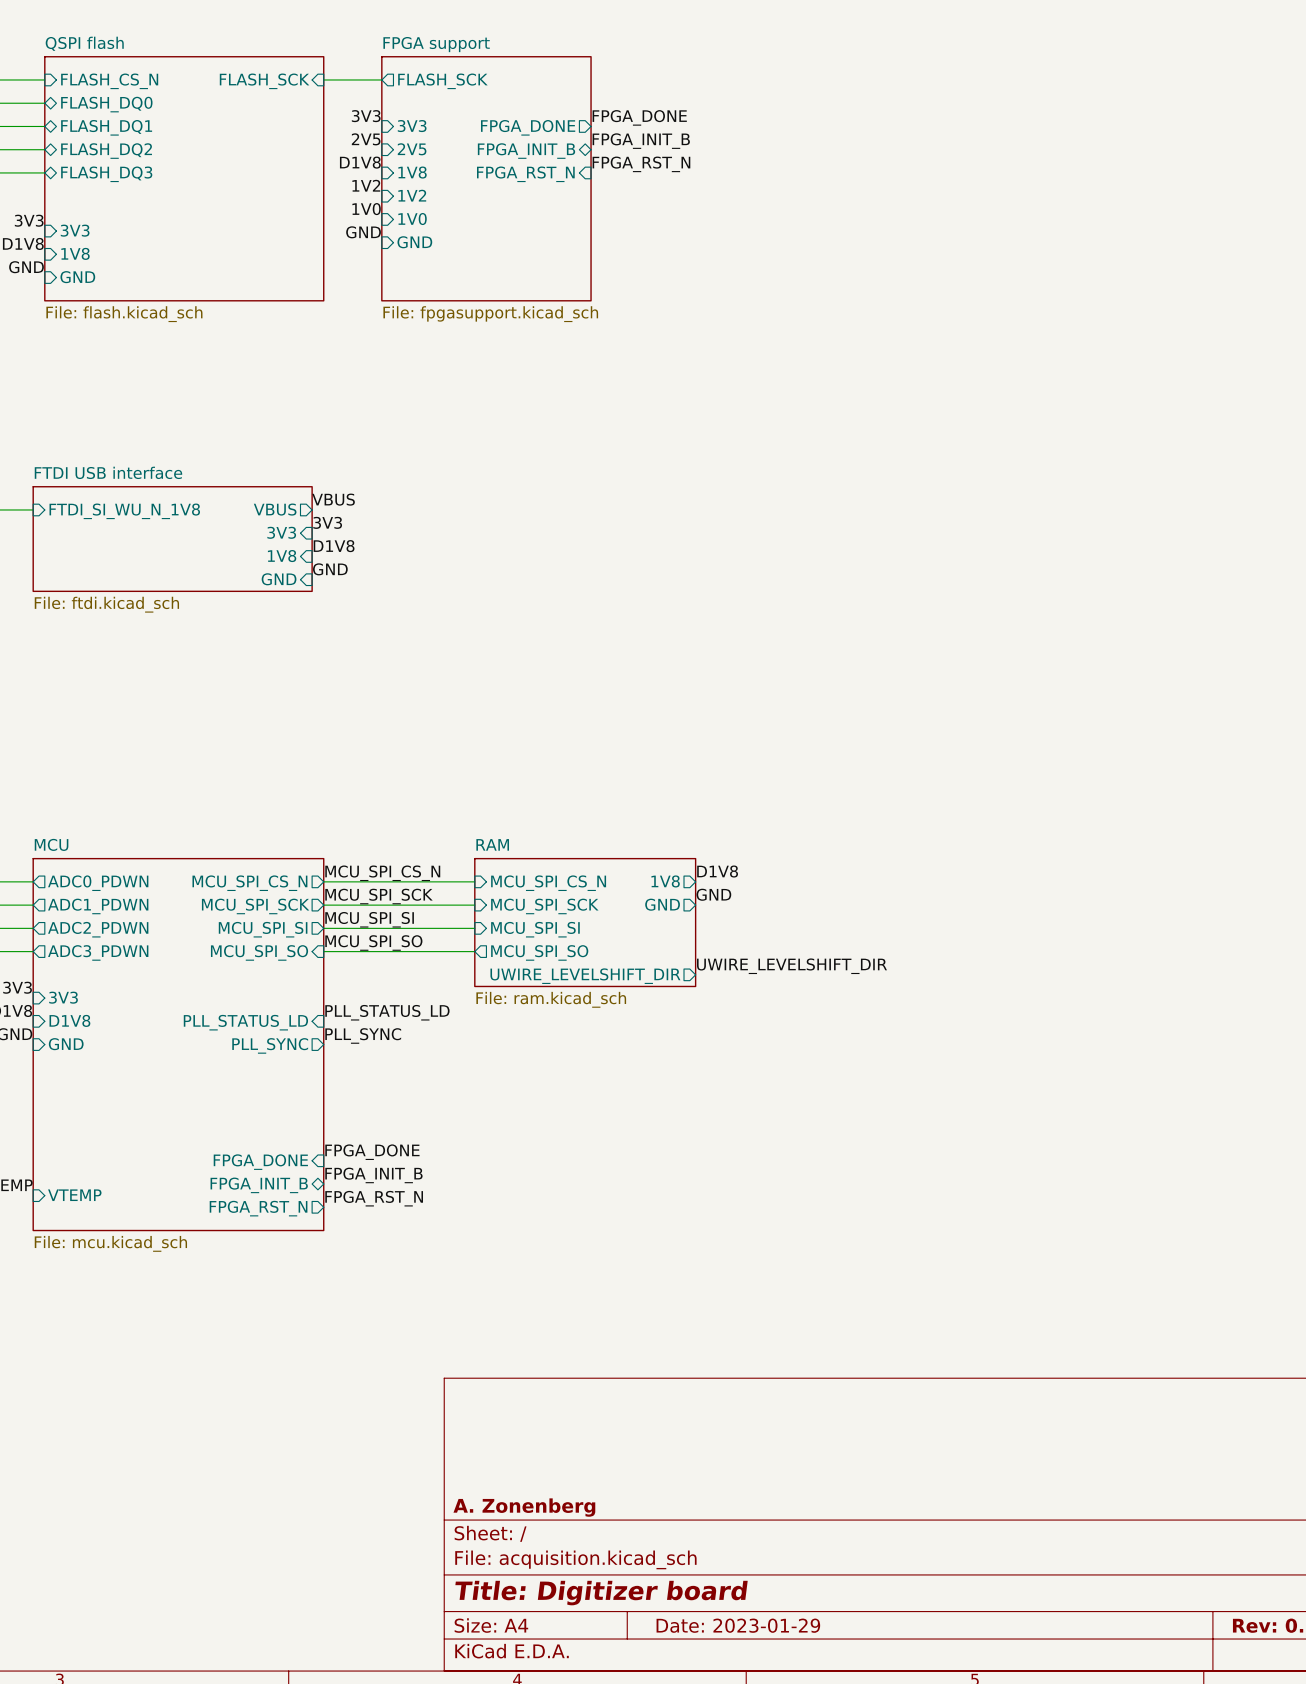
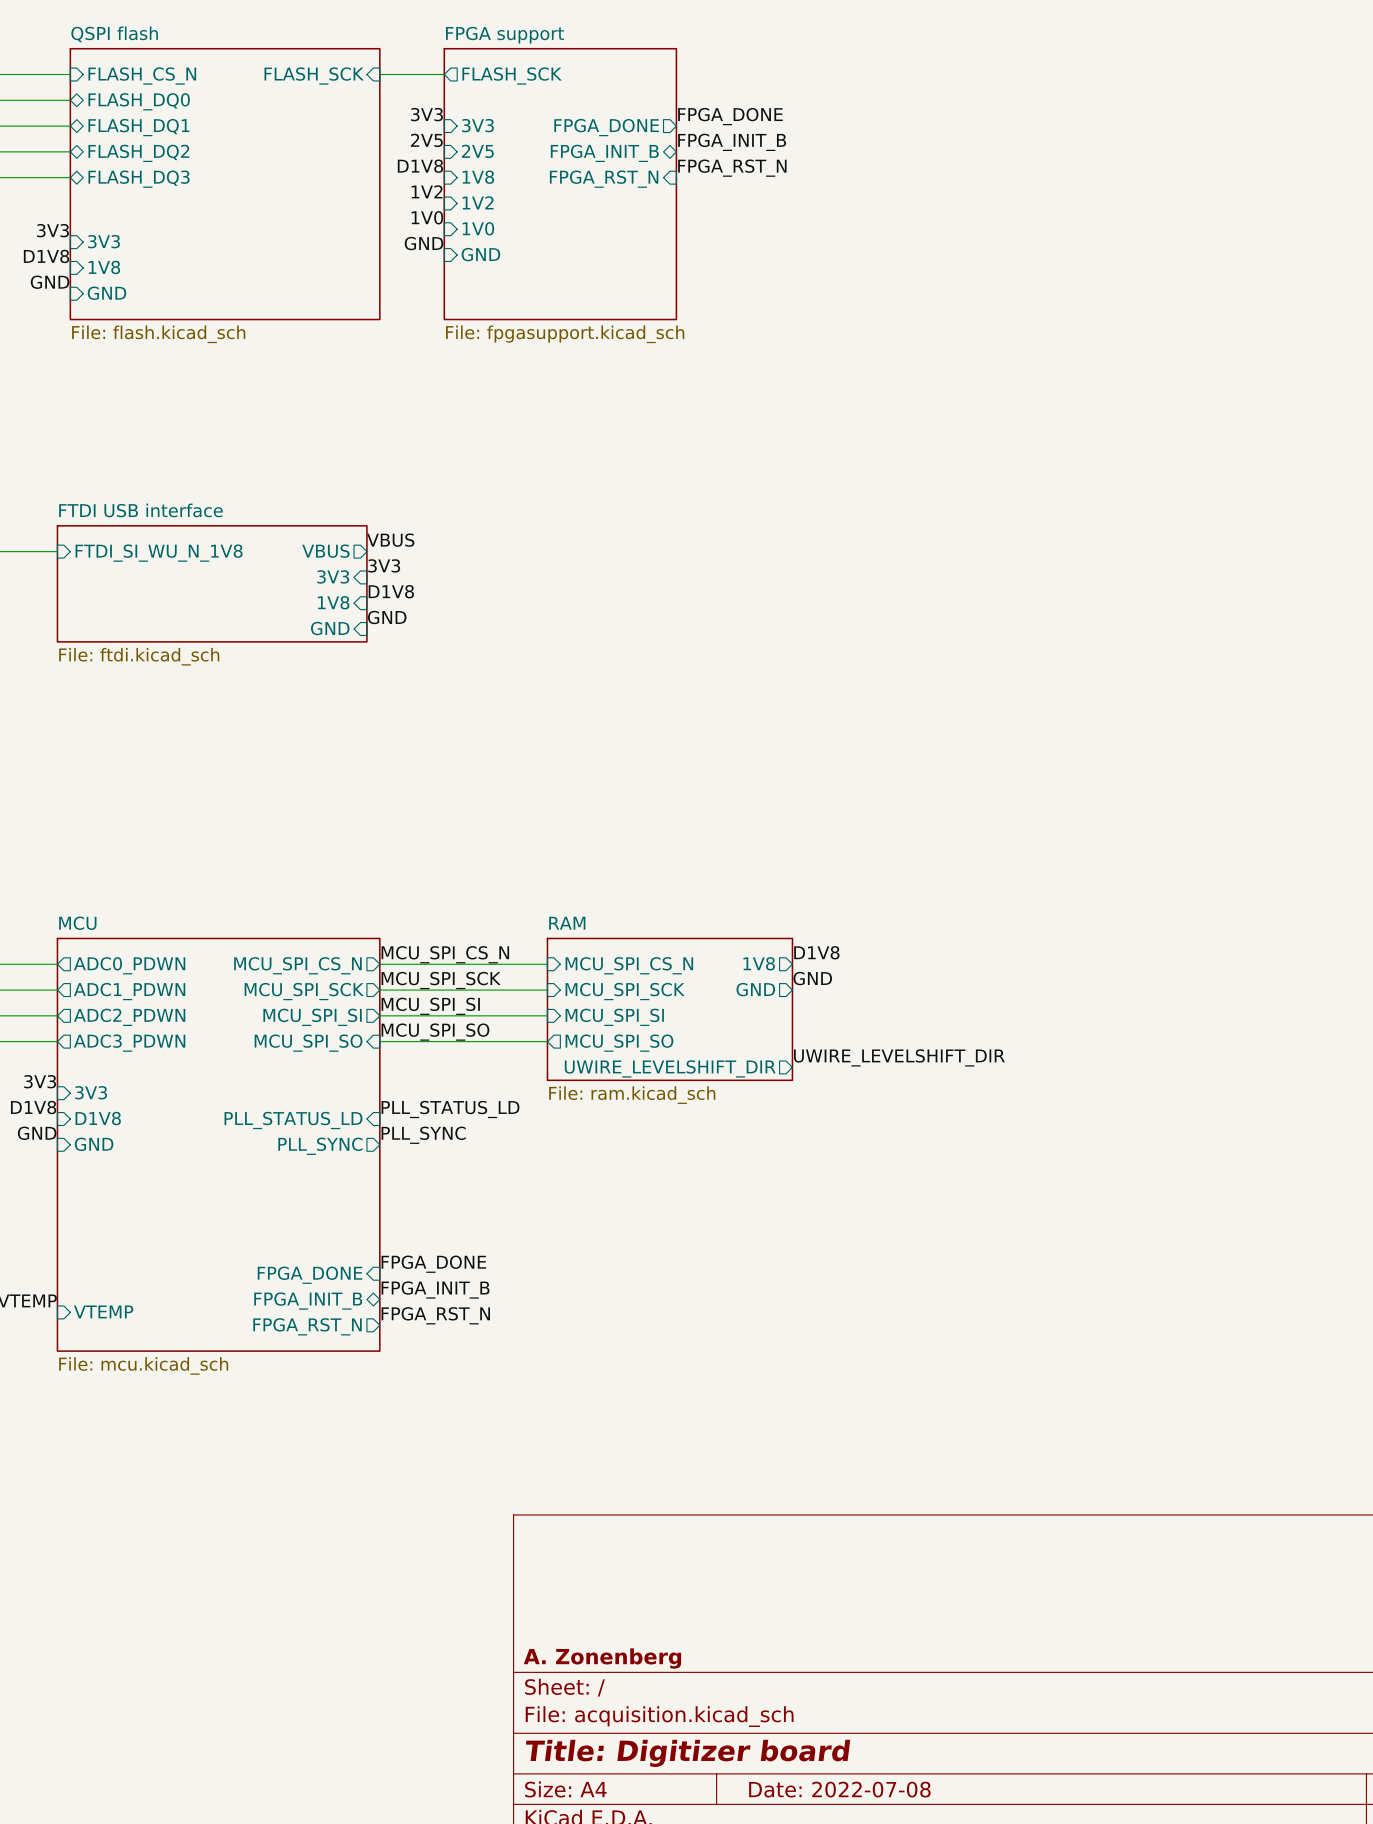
title block: Date: 2023-01-29 (738, 1625) -> Date: 2022-07-08 (839, 1789)

